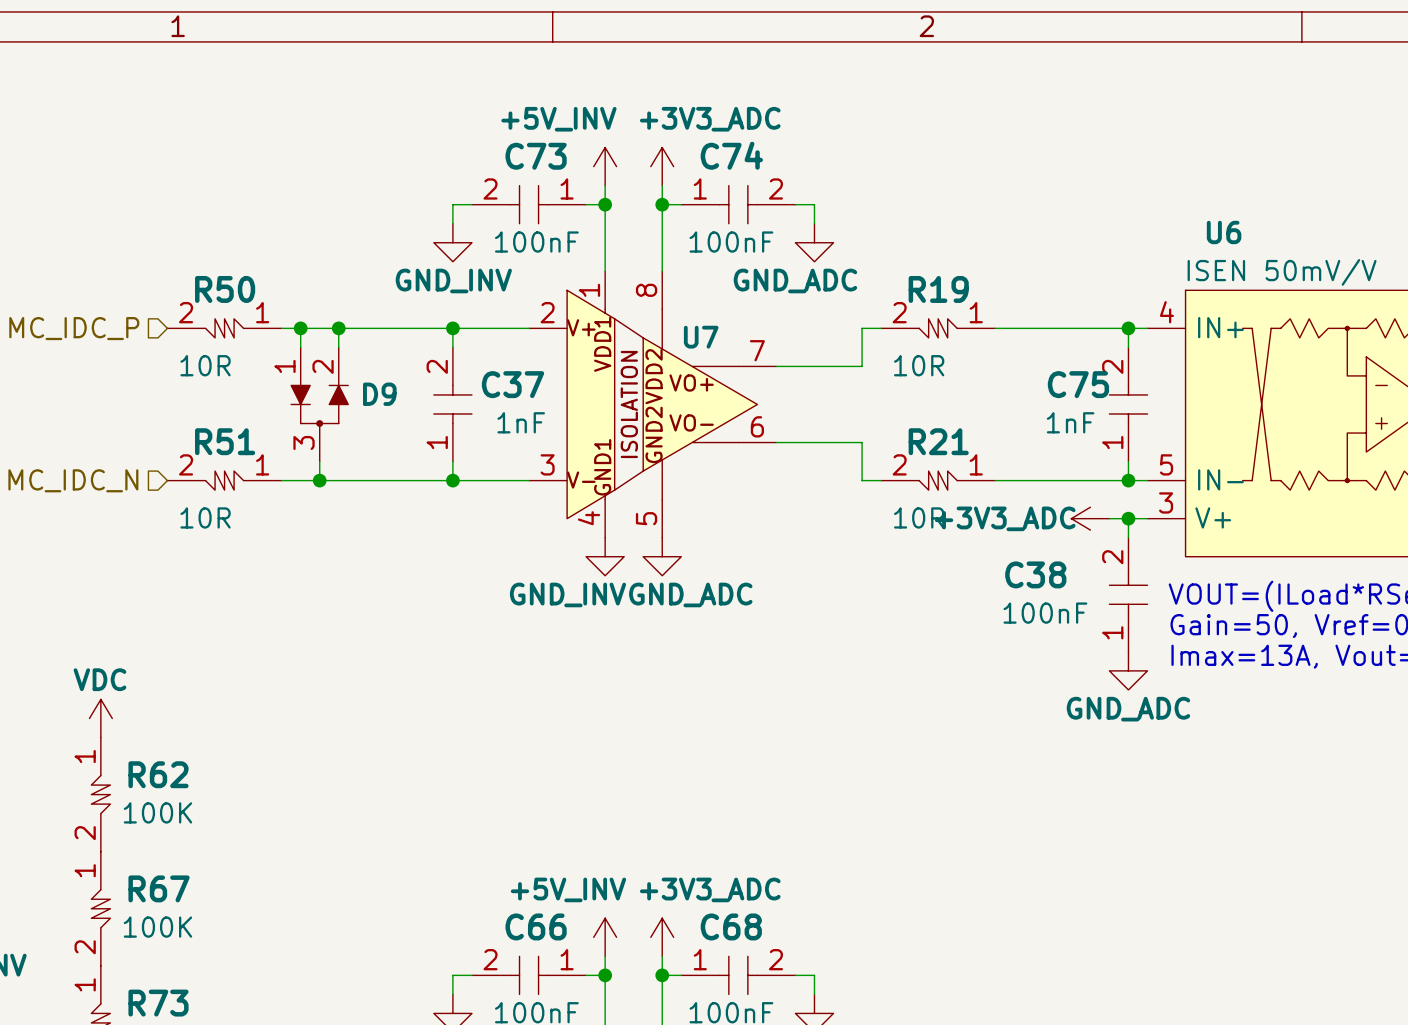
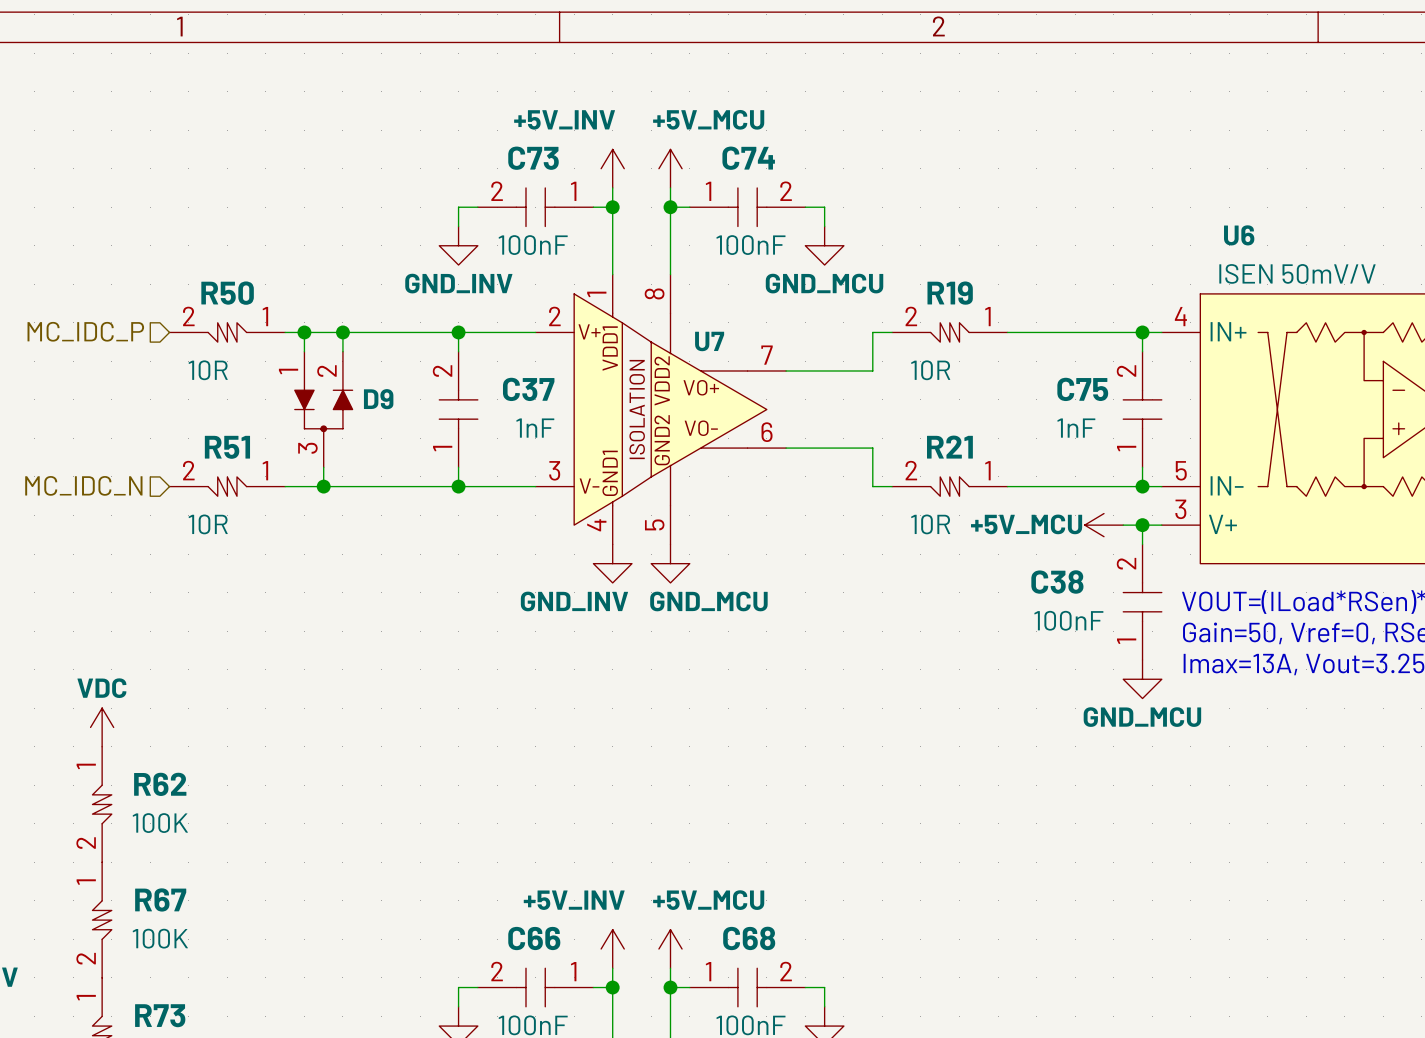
power symbol: +3V3_ADC (662, 166) -> +5V_MCU (670, 168)
power symbol: GND_ADC (814, 242) -> GND_MCU (824, 245)
power symbol: +3V3_ADC (1090, 518) -> +5V_MCU (1103, 525)
power symbol: GND_ADC (662, 556) -> GND_MCU (670, 563)
power symbol: GND_ADC (1128, 670) -> GND_MCU (1142, 679)
power symbol: +3V3_ADC (662, 937) -> +5V_MCU (670, 948)

